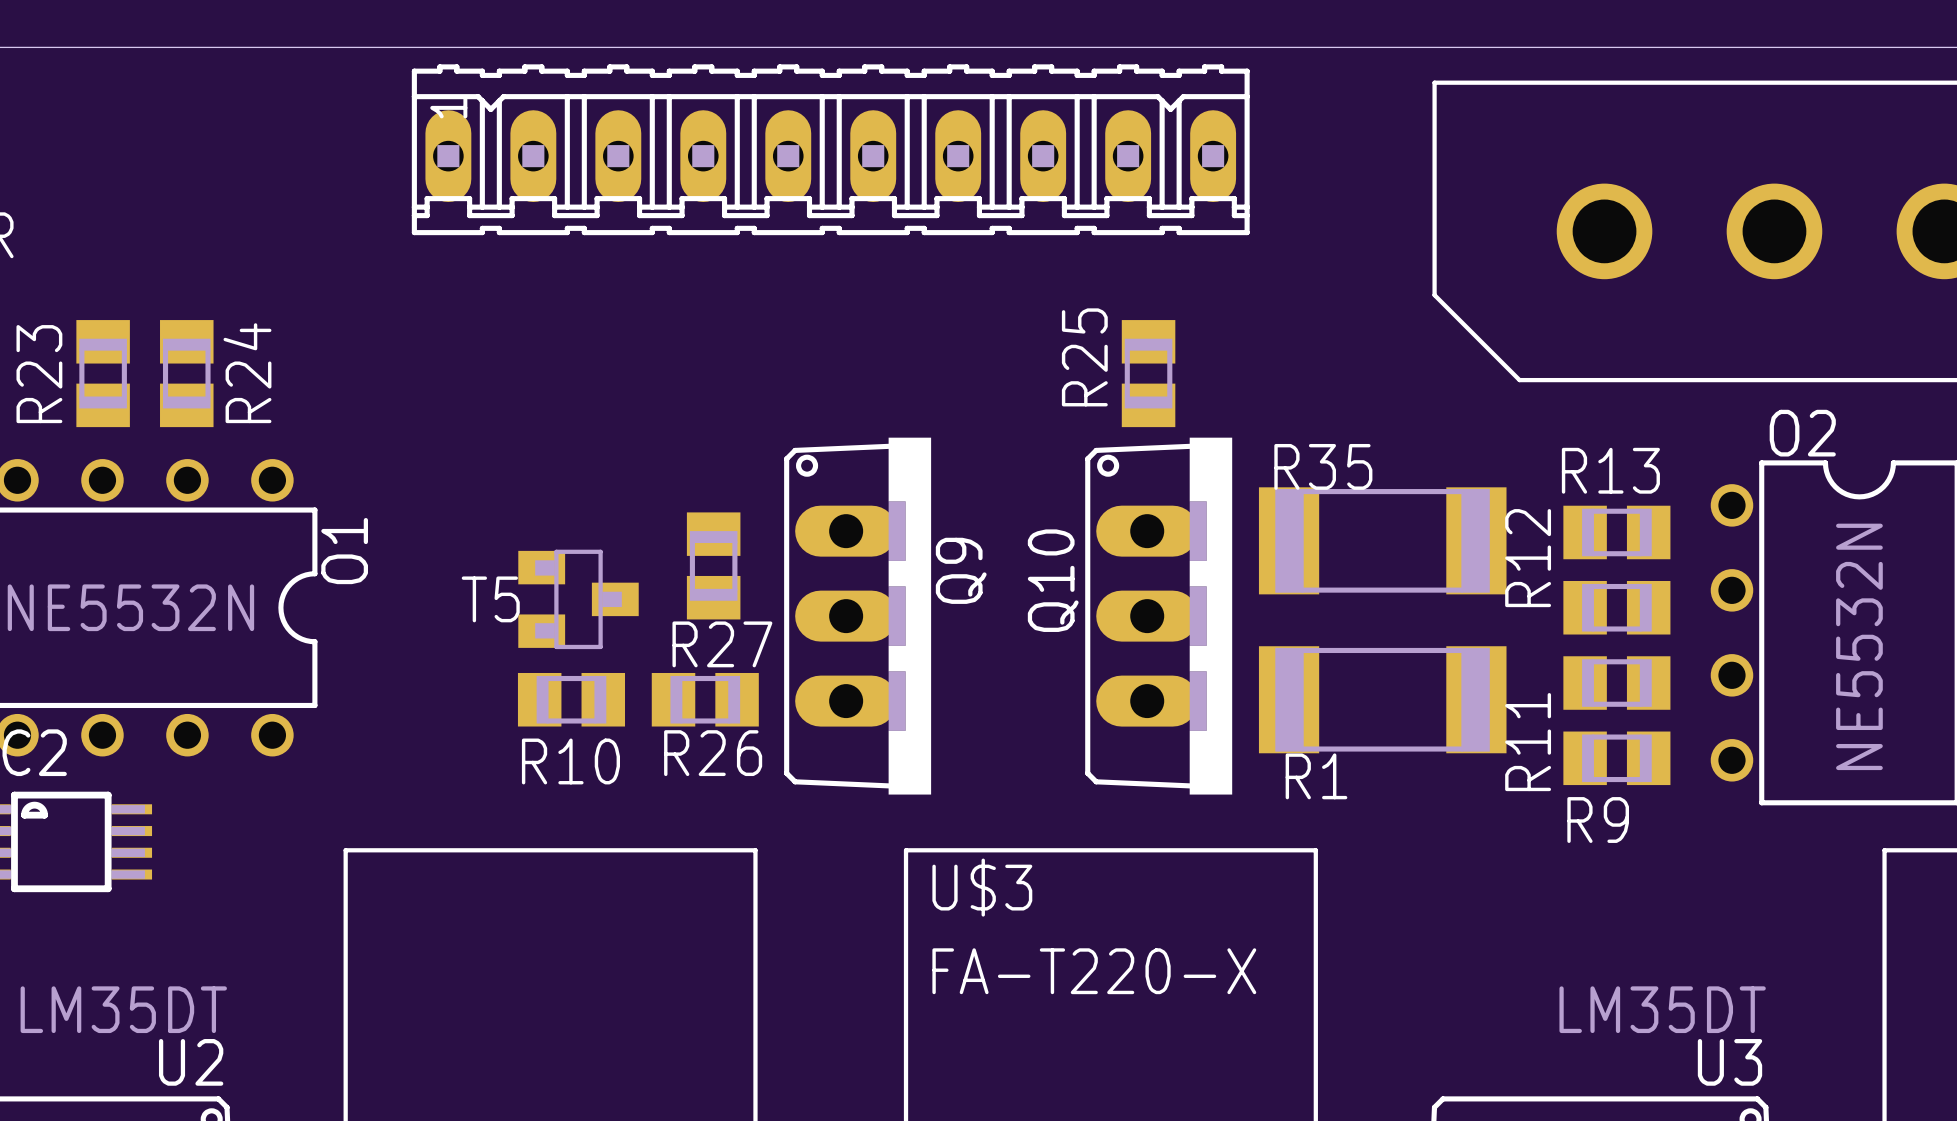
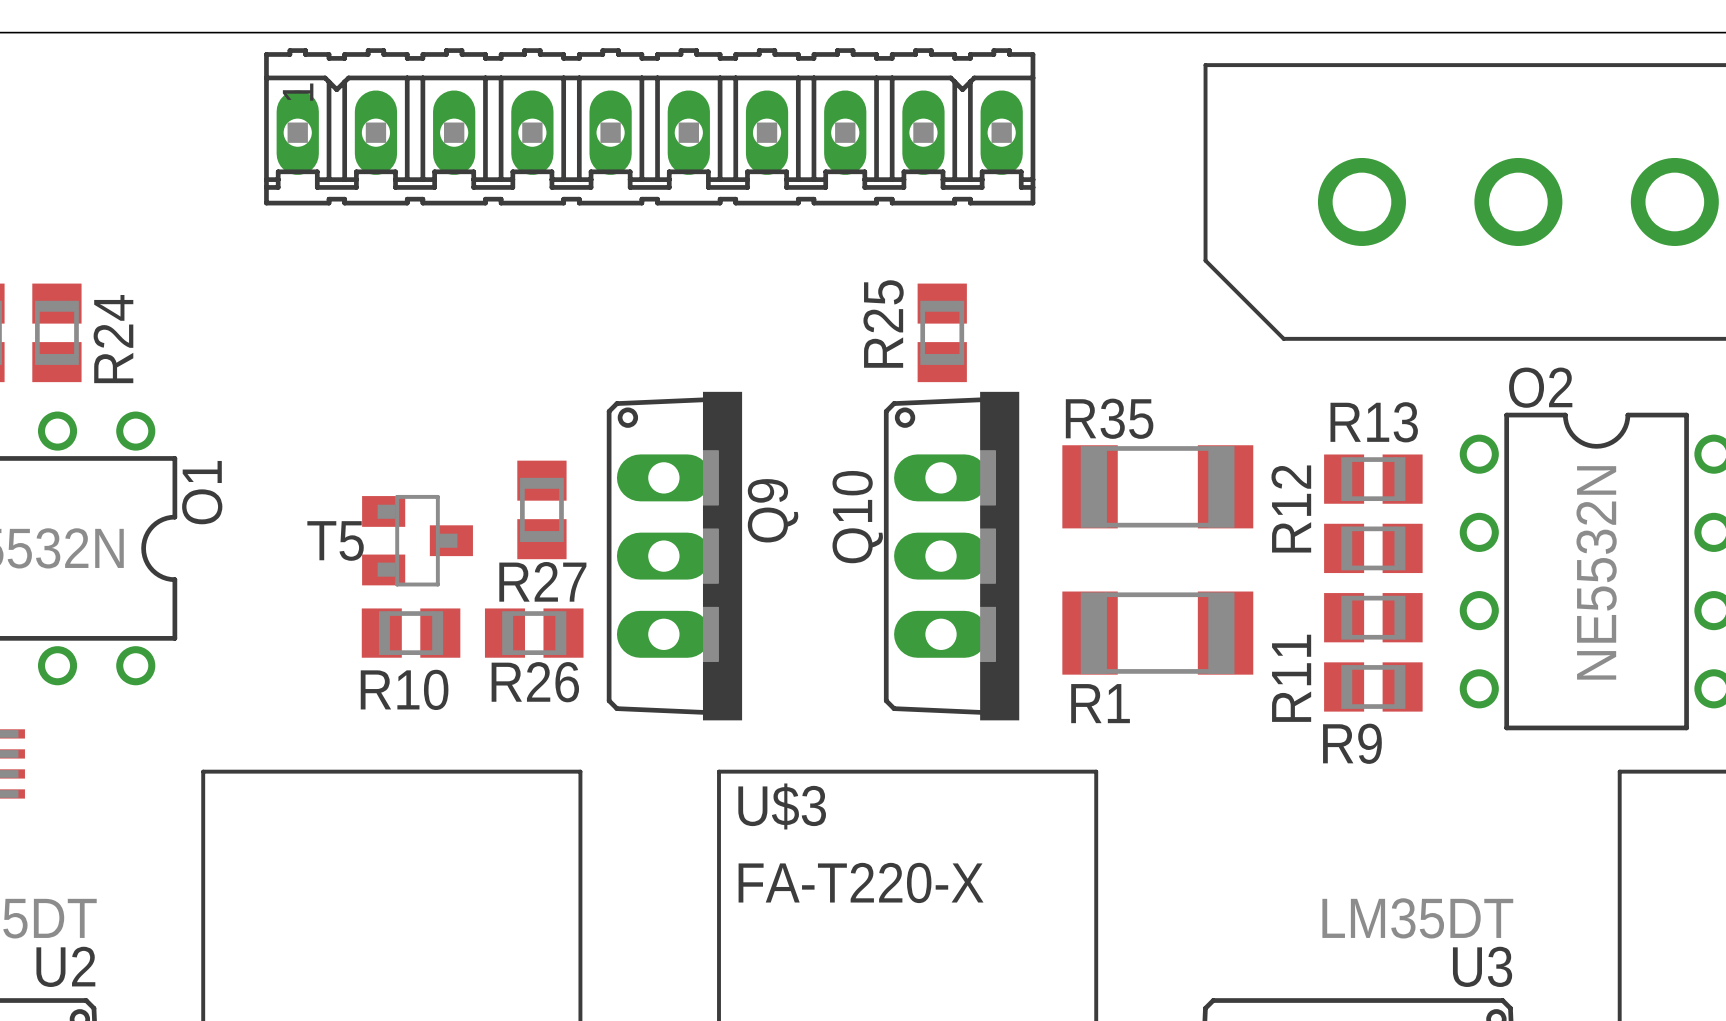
R35 footprint: [1258, 487, 1507, 595] -> [1062, 445, 1254, 529]
R1 footprint: [1258, 646, 1507, 754] -> [1062, 591, 1254, 675]

